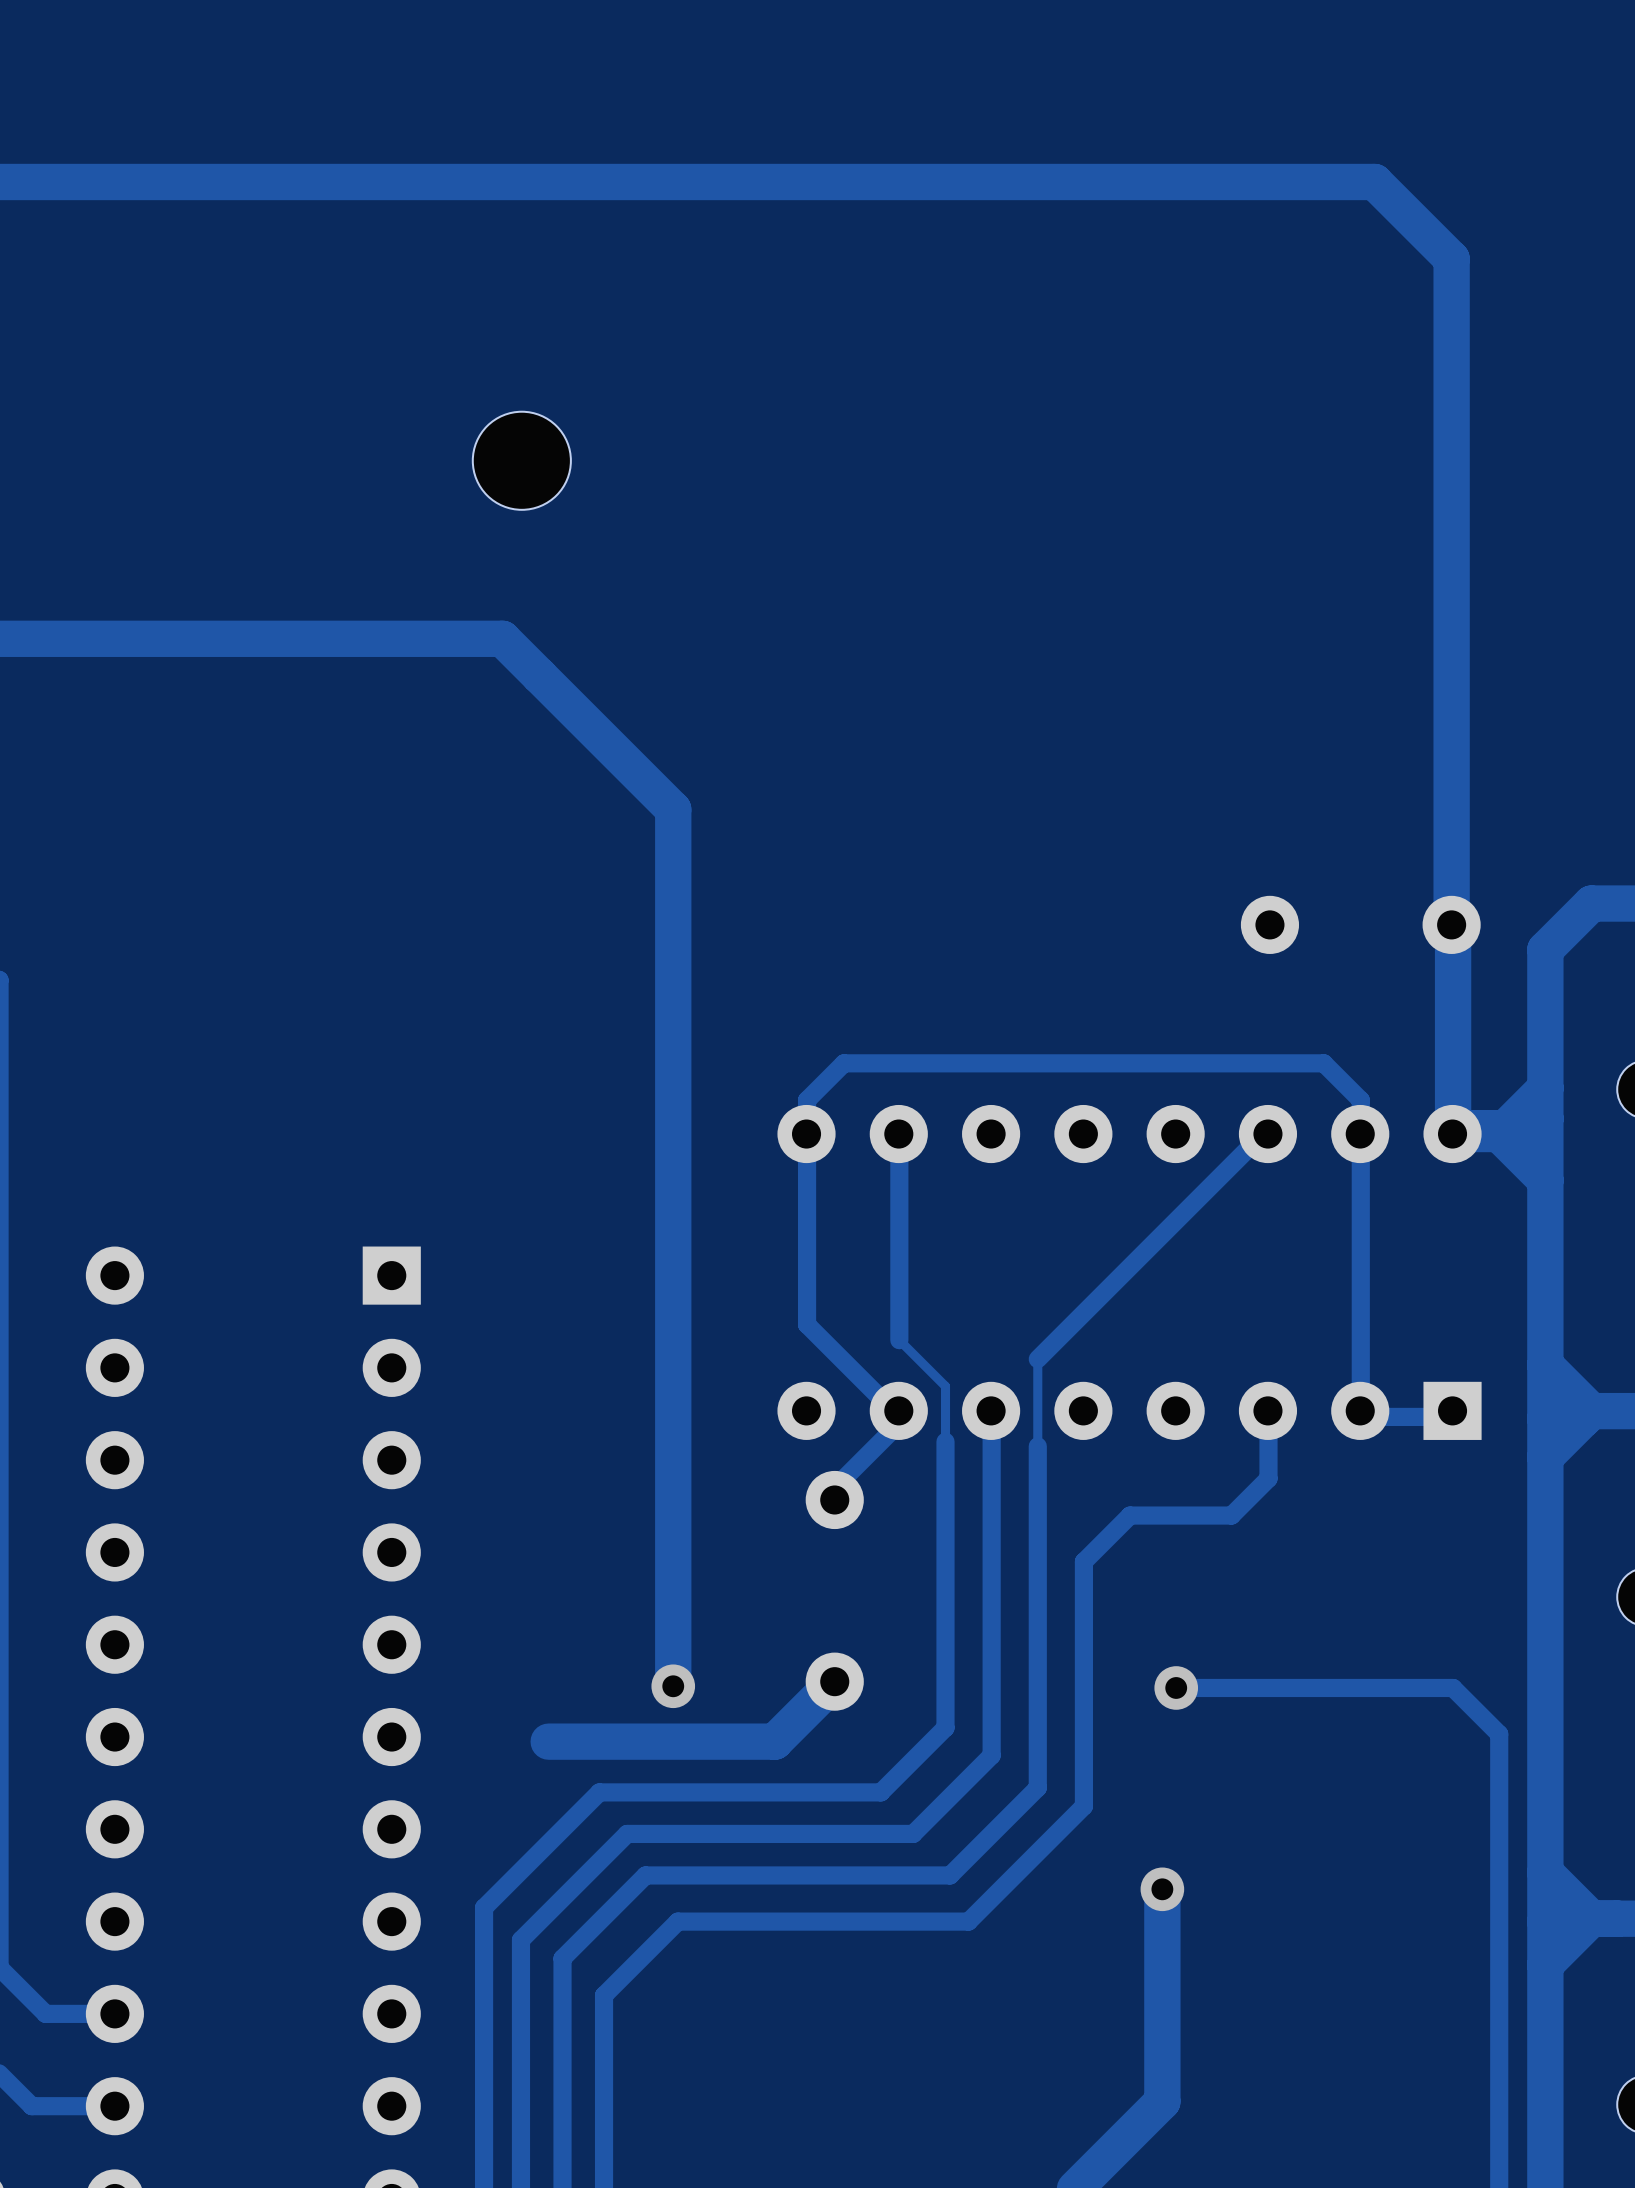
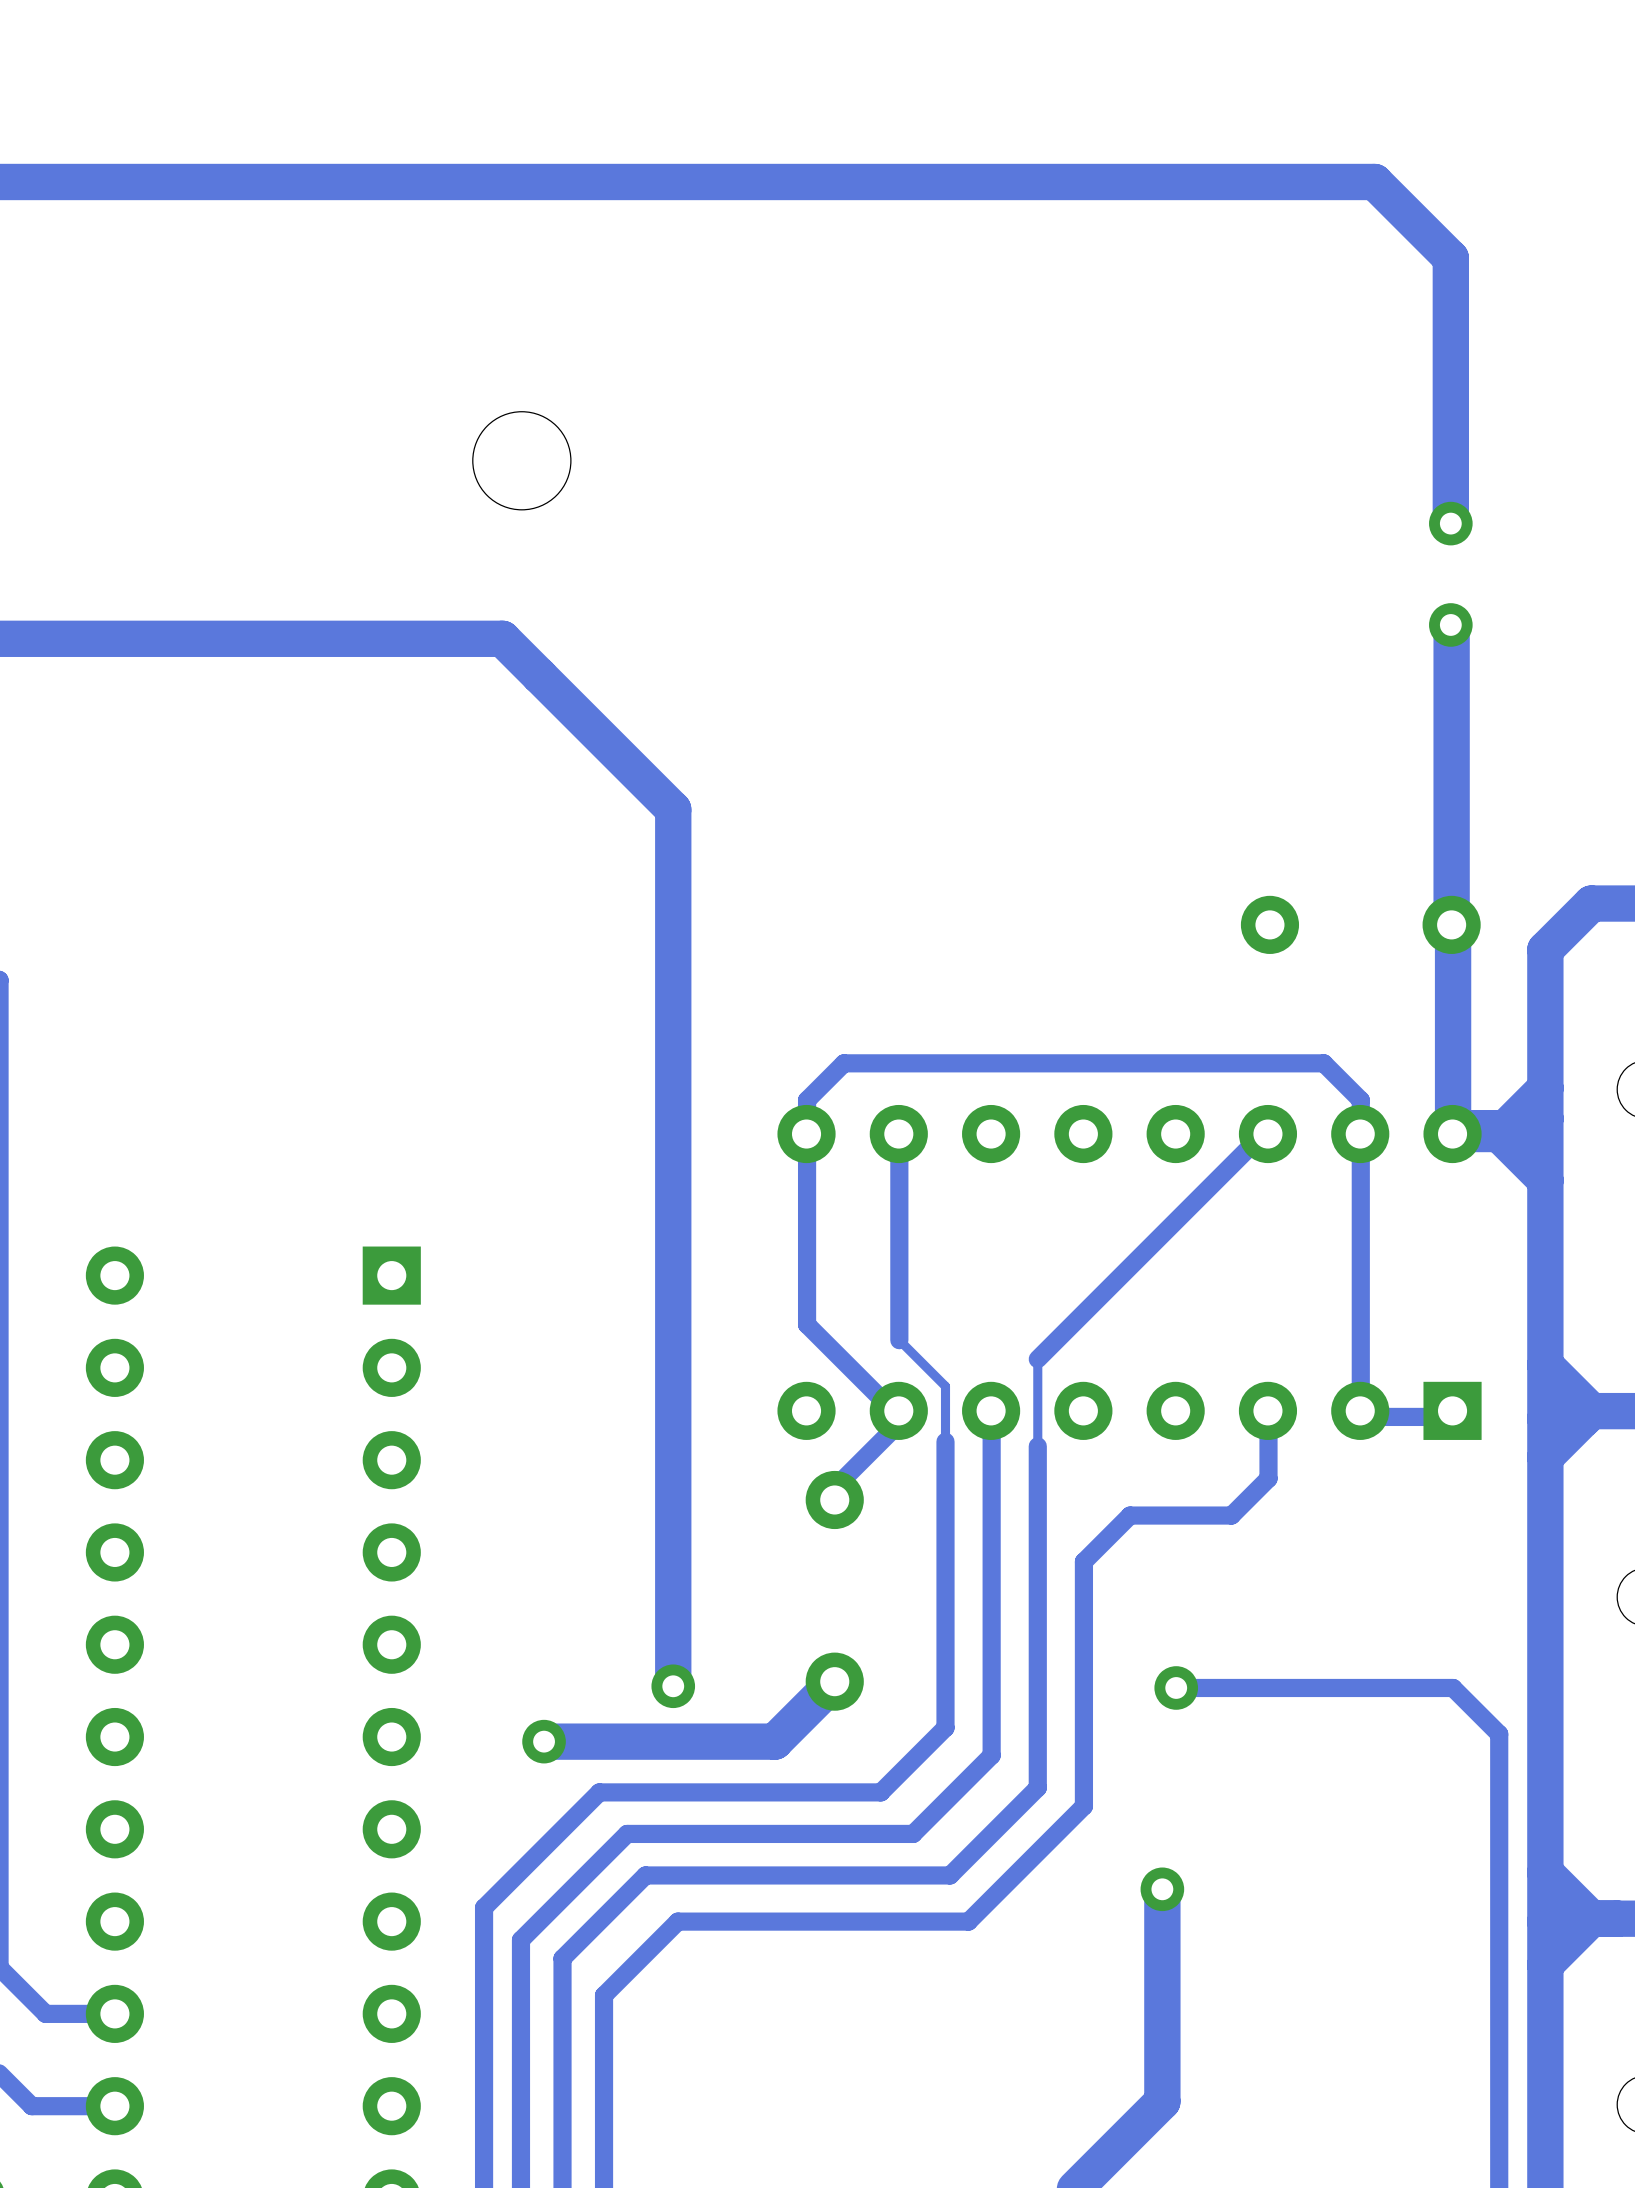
track: (1450, 258) (1451, 623) -> (1450, 258) (1450, 523)
via: none -> (1450, 523)
via: none -> (1450, 624)
via: none -> (544, 1741)

